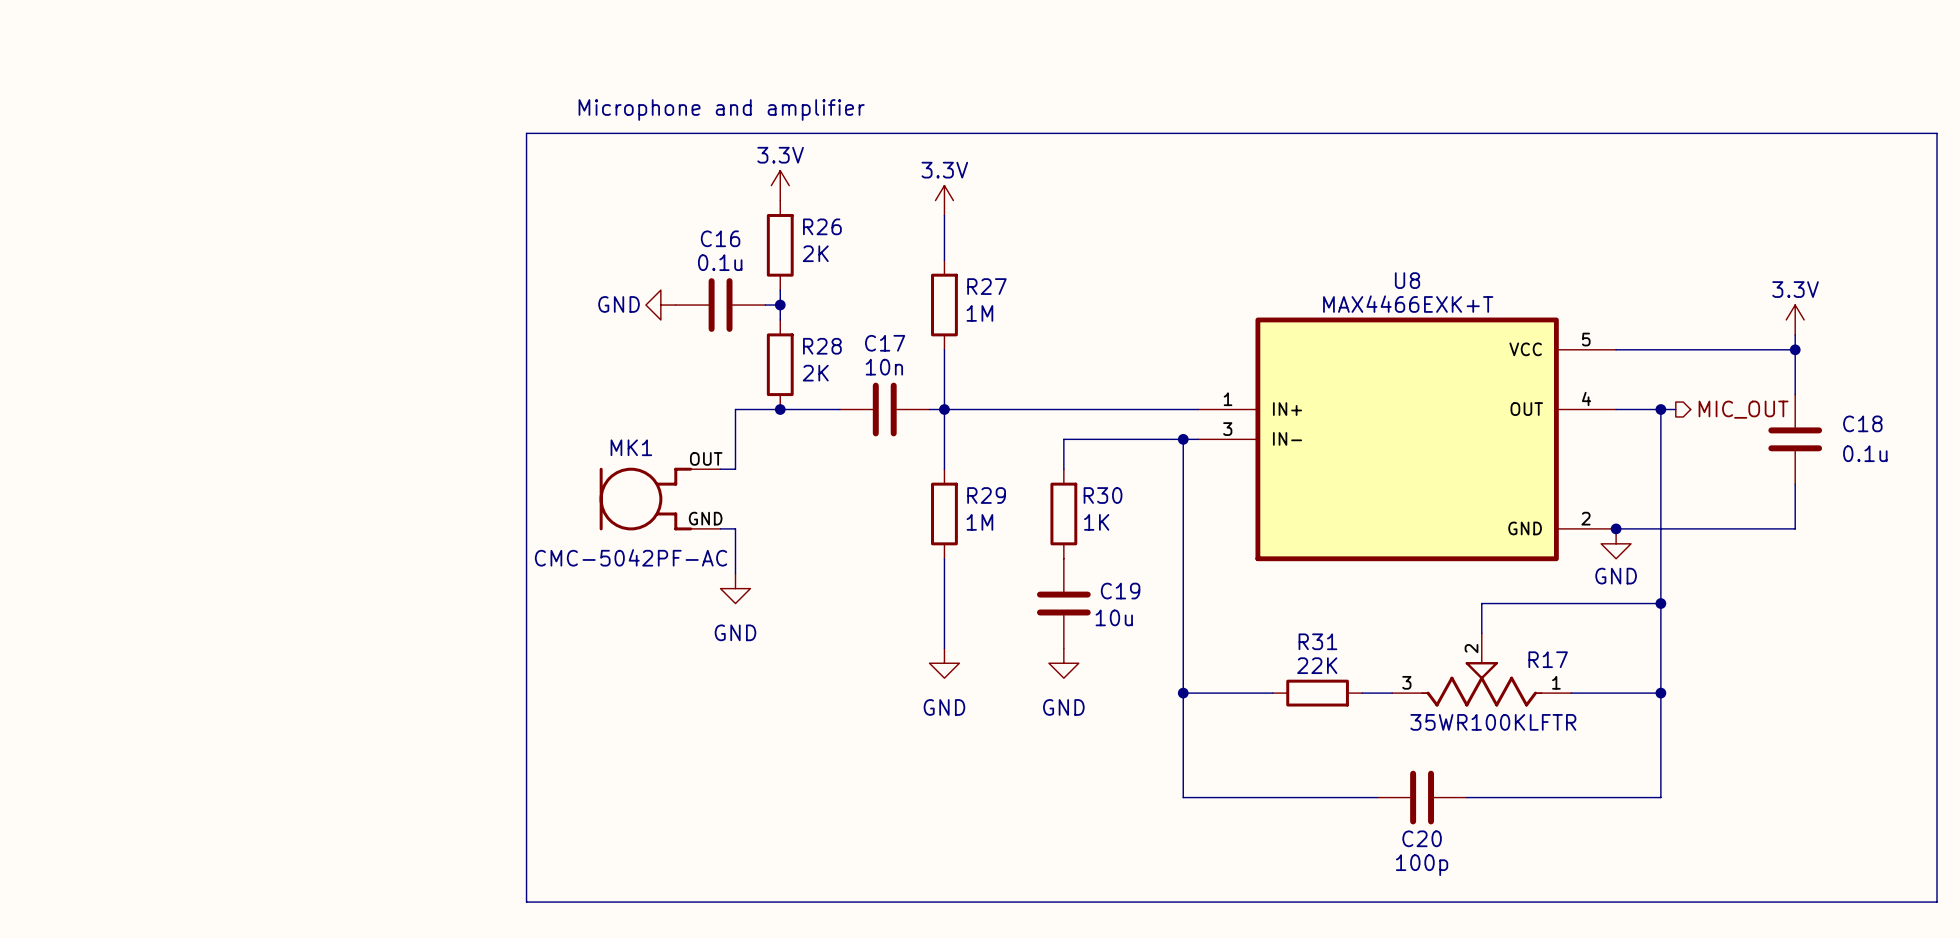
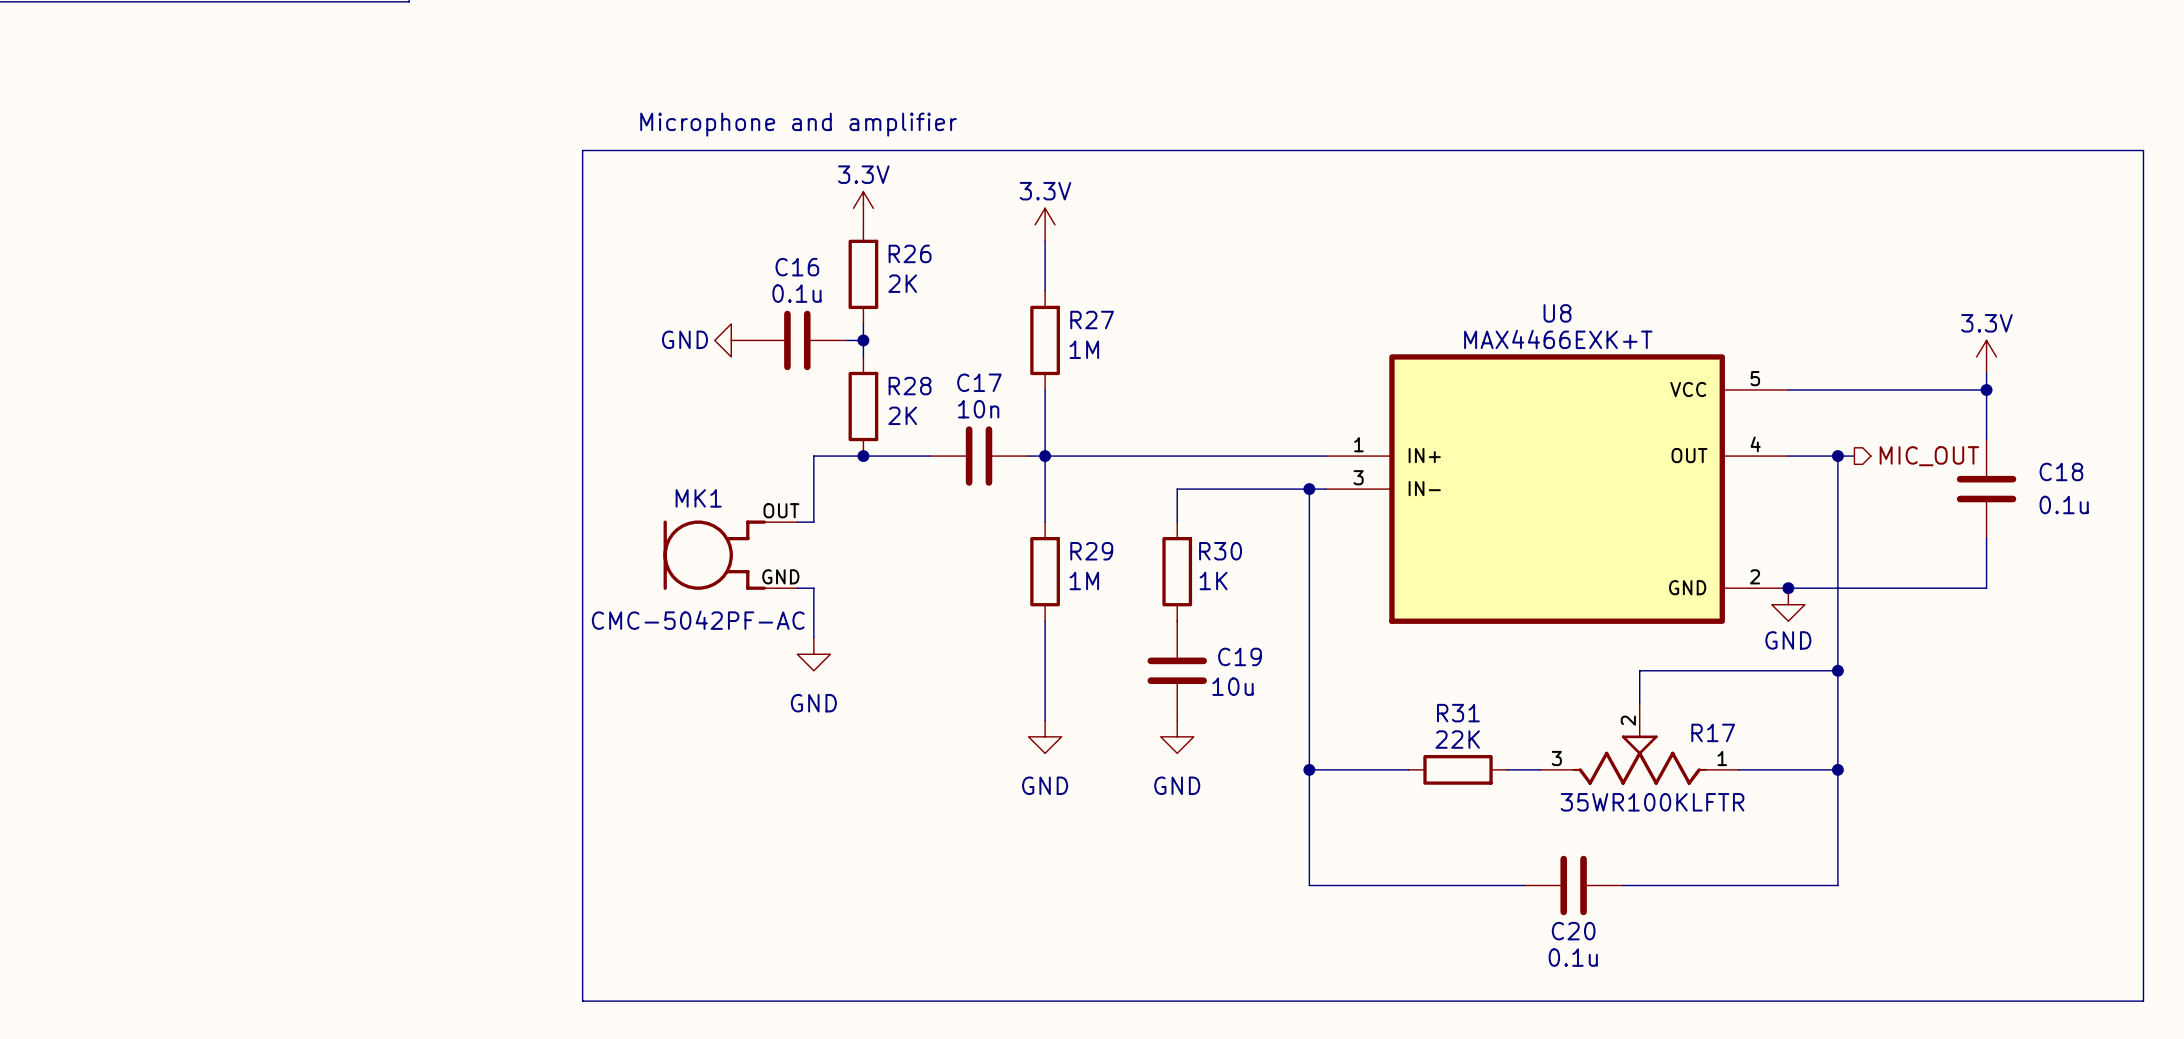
C20 value: 100p (1422, 865) -> 0.1u (1573, 957)

